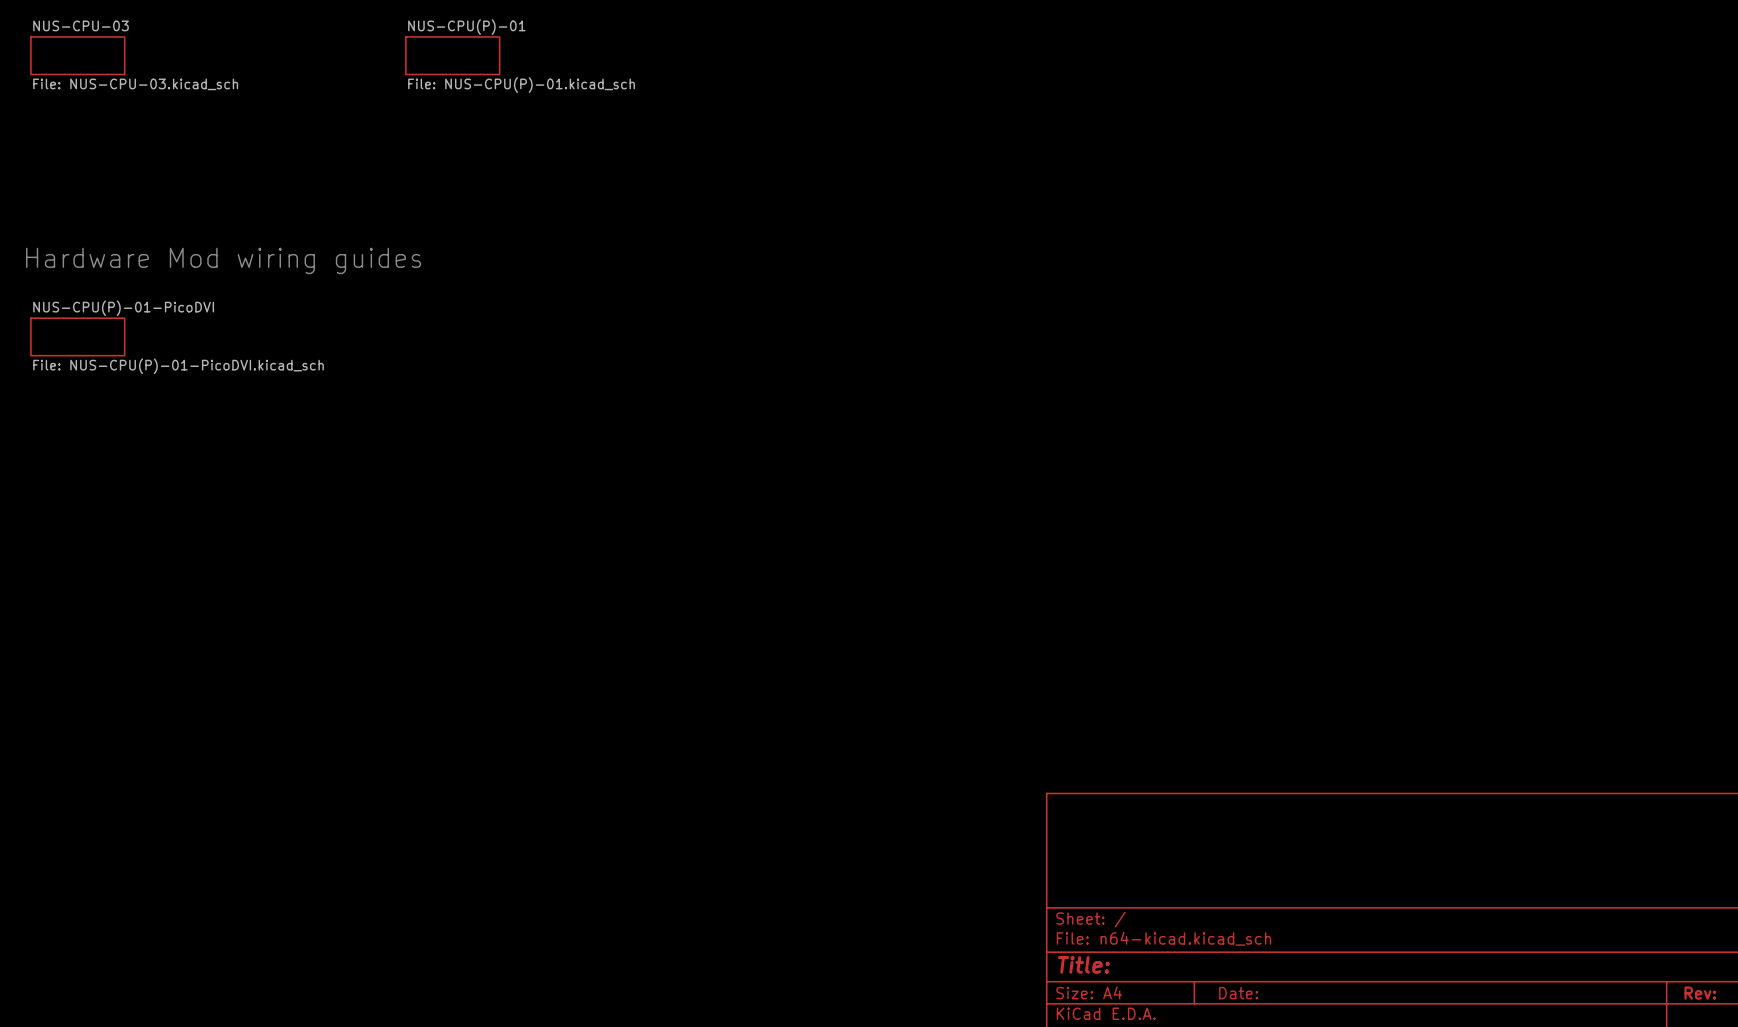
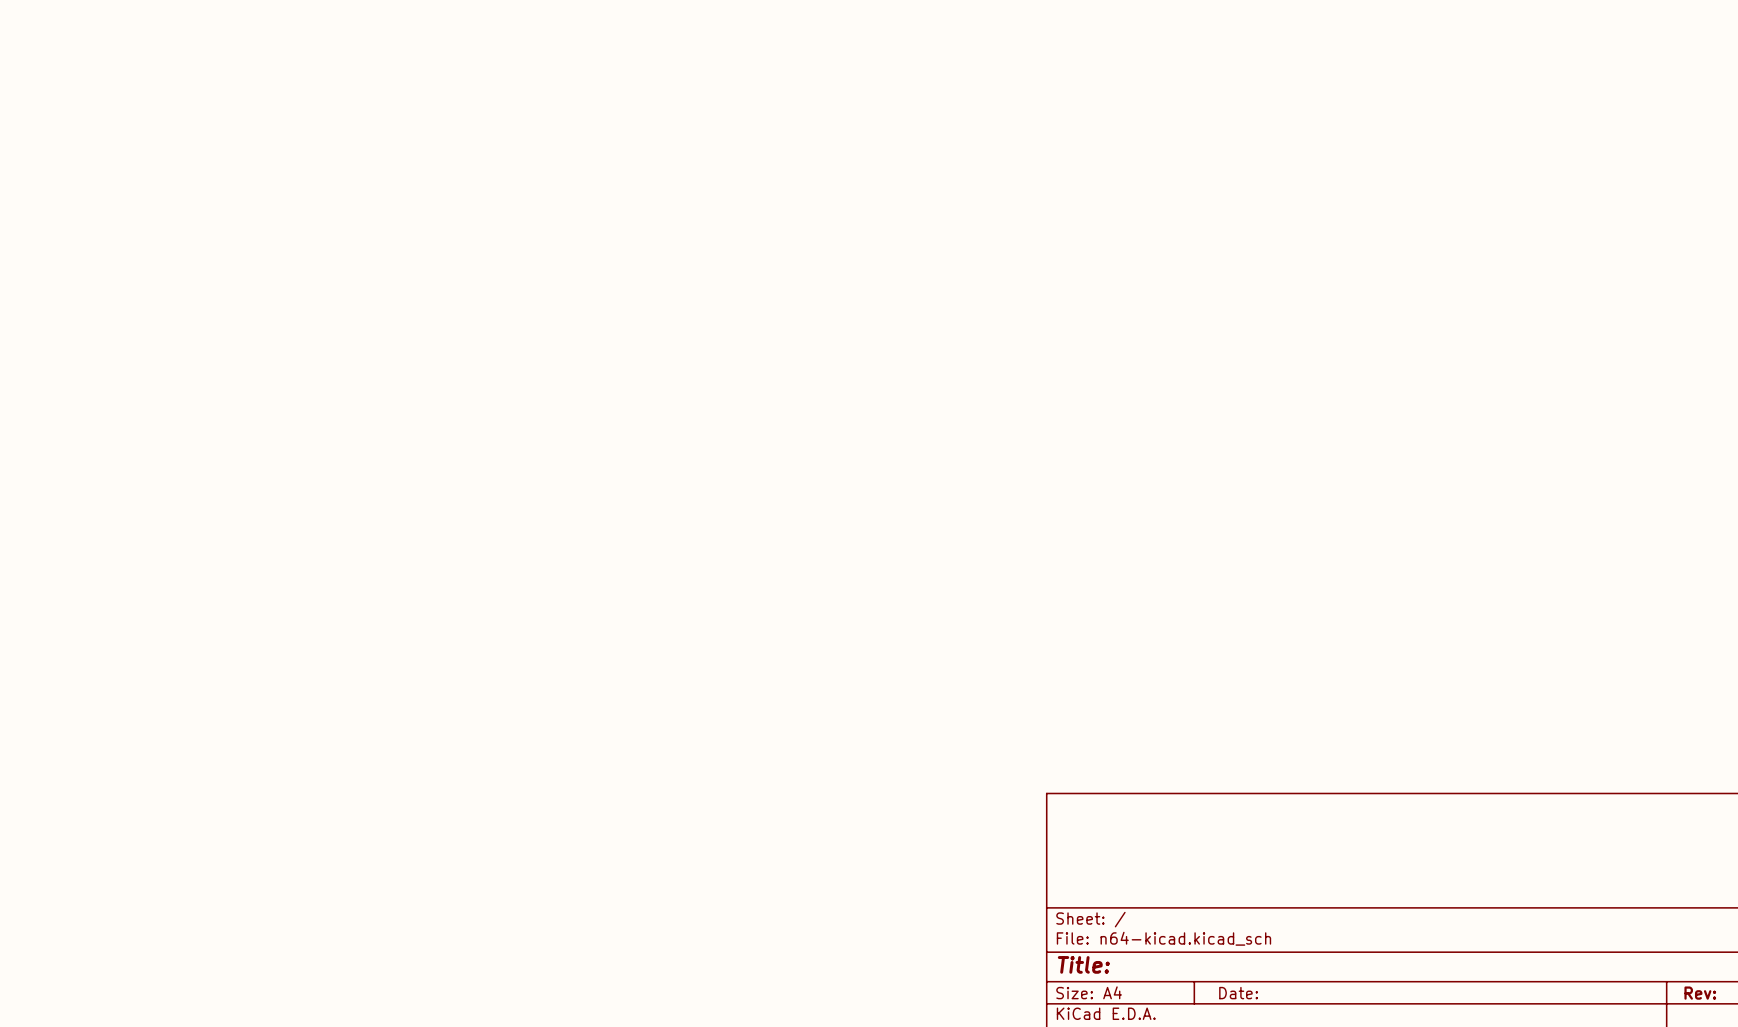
sheet NUS-CPU-03: File: NUS-CPU-03.kicad_sch (77, 55) -> none
sheet NUS-CPU(P)-01: File: NUS-CPU(P)-01.kicad_sch (452, 55) -> none
text: Hardware Mod wiring guides (223, 260) -> none
sheet NUS-CPU(P)-01-PicoDVI: File: NUS-CPU(P)-01-PicoDVI.kicad_sch (77, 336) -> none

